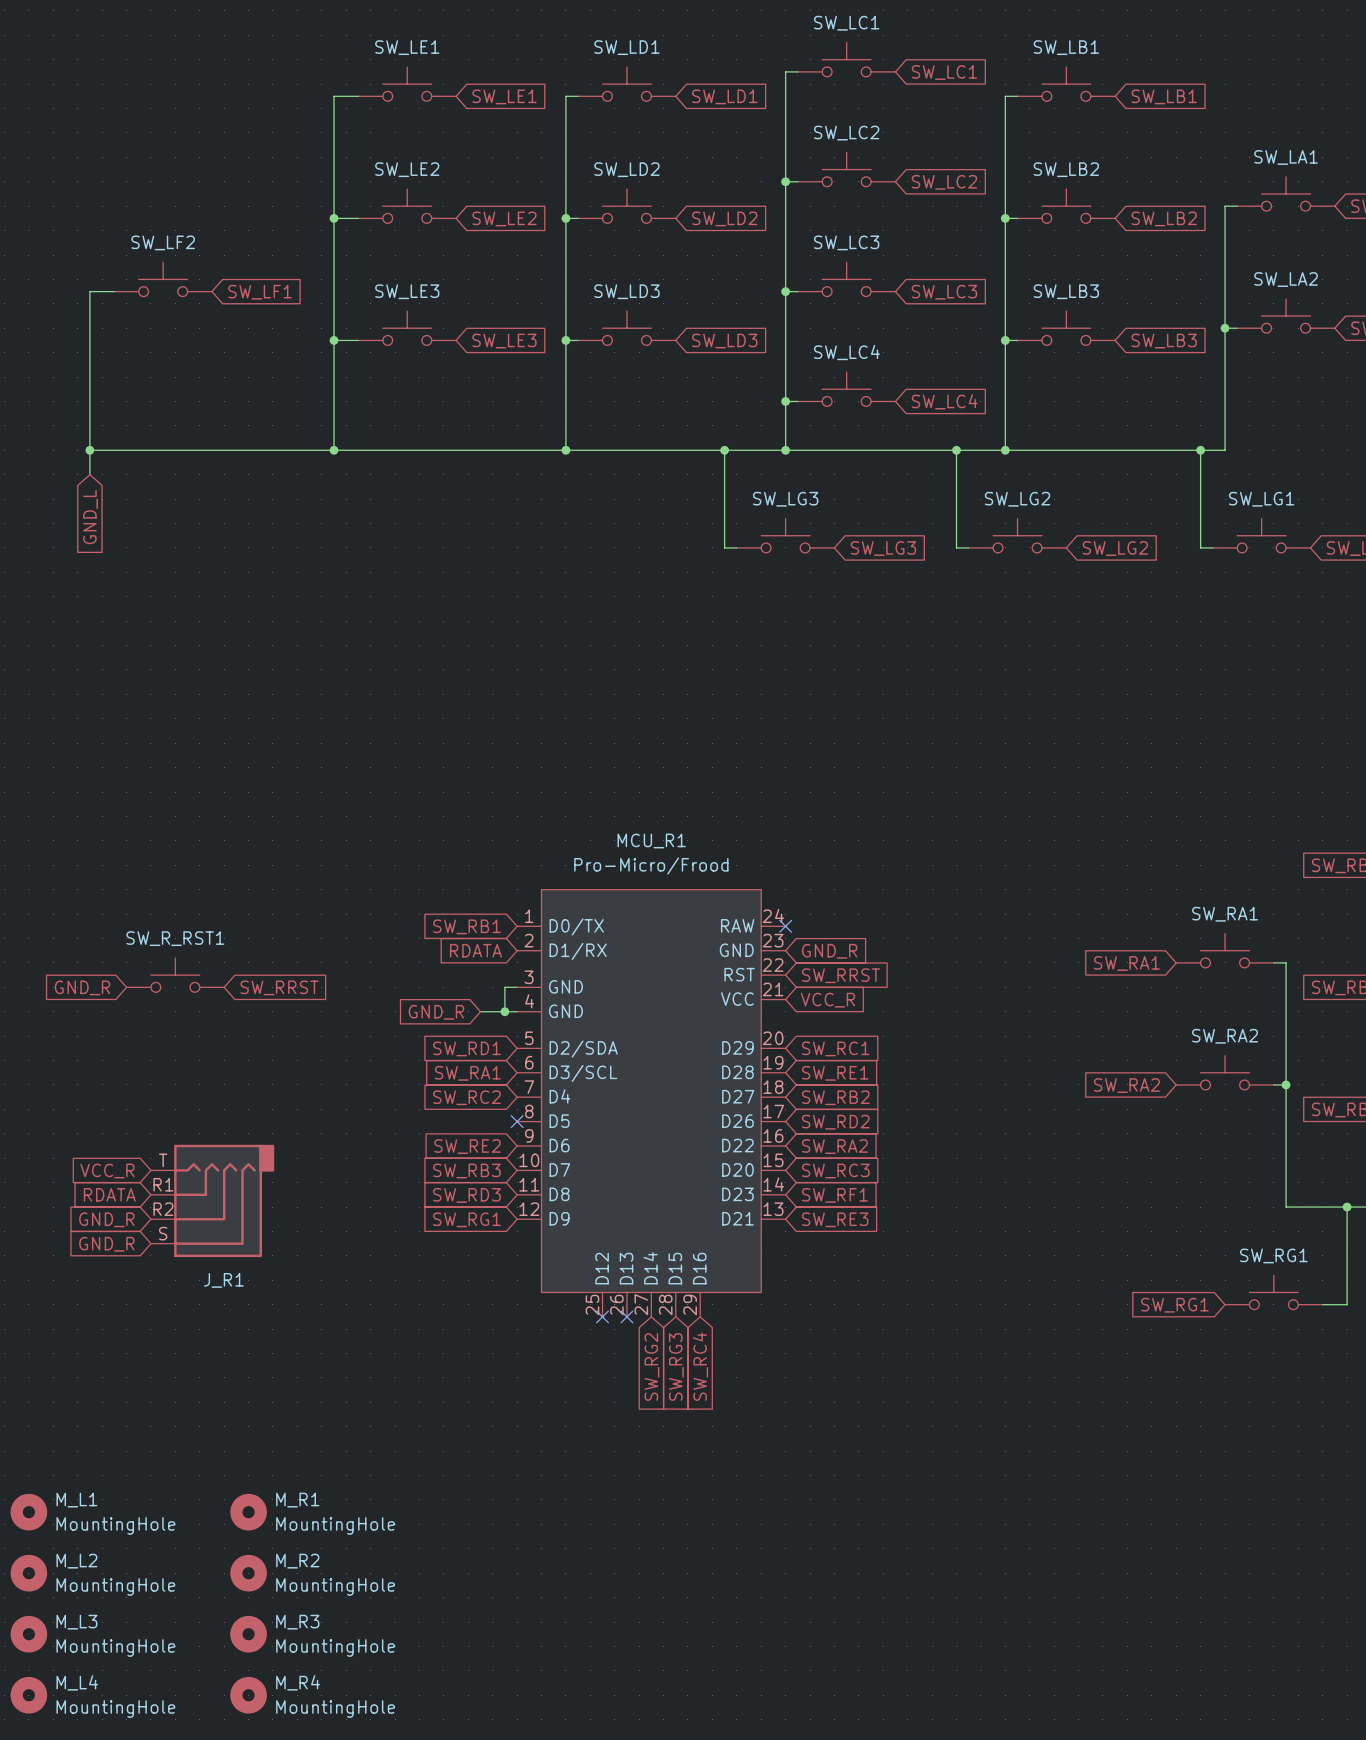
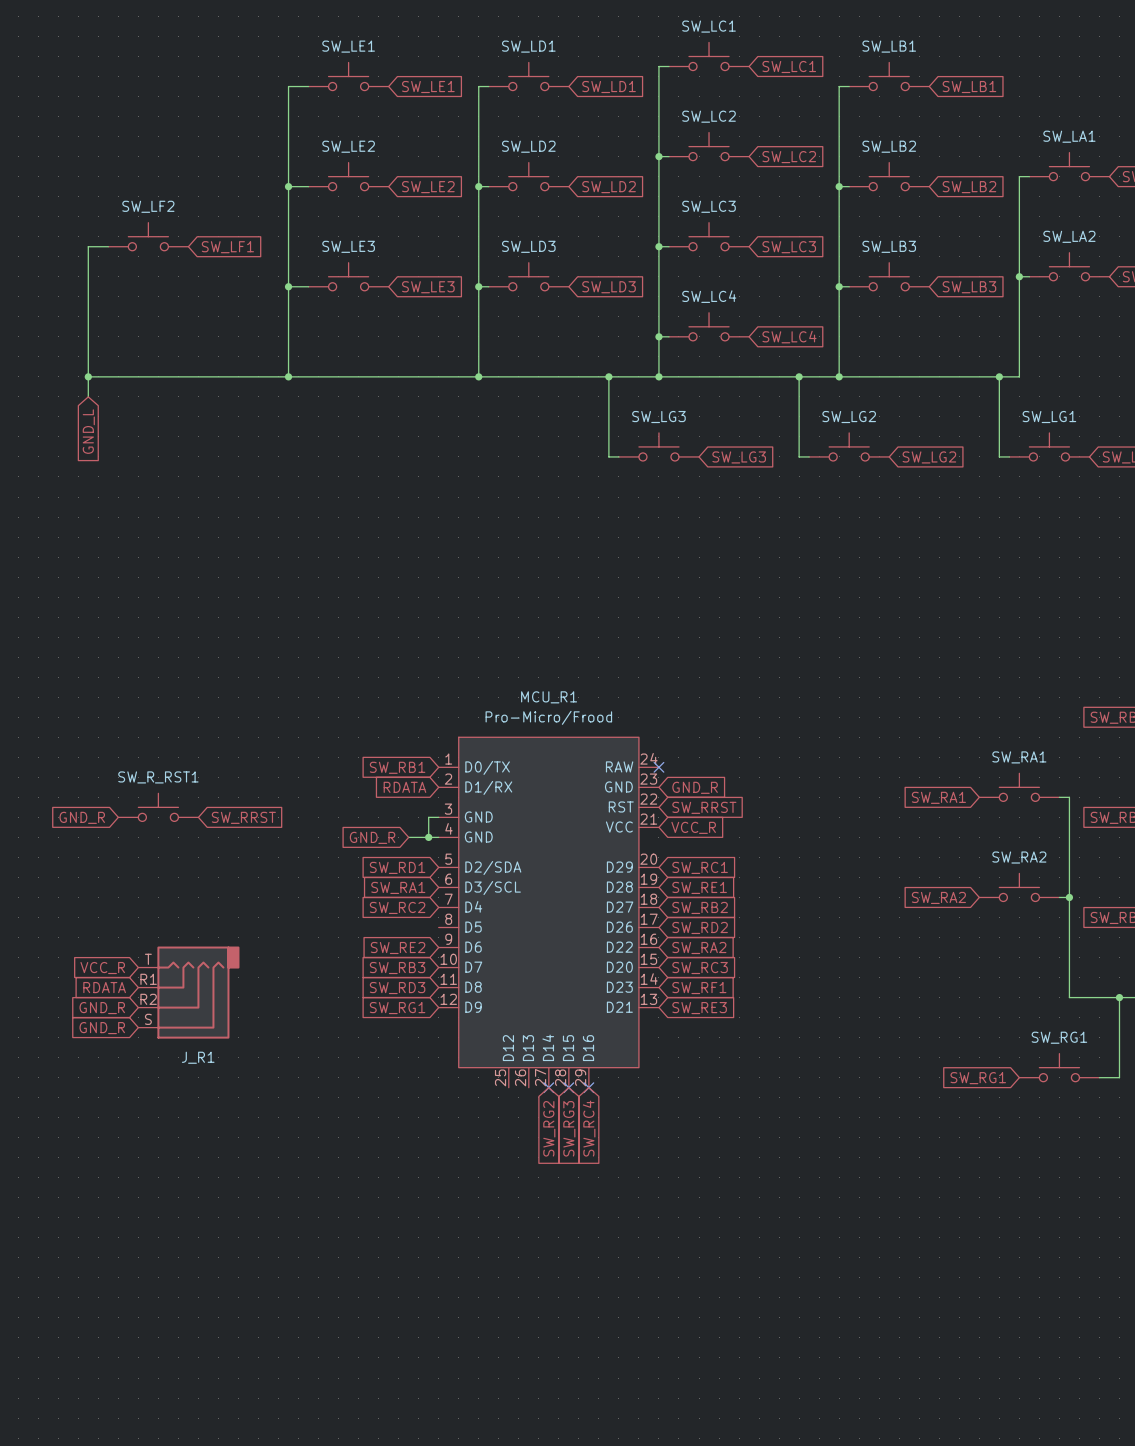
no-connect mark: (517, 1121) -> none
no-connect mark: (602, 1316) -> none
no-connect mark: (626, 1316) -> none
no-connect mark: none -> (548, 1087)
no-connect mark: none -> (568, 1087)
no-connect mark: none -> (588, 1087)
M_L1: MountingHole (28, 1512) -> none
M_R1: MountingHole (248, 1512) -> none
M_L2: MountingHole (28, 1573) -> none
M_R2: MountingHole (248, 1573) -> none
M_L3: MountingHole (28, 1634) -> none
M_R3: MountingHole (248, 1634) -> none
M_L4: MountingHole (28, 1695) -> none
M_R4: MountingHole (248, 1695) -> none

